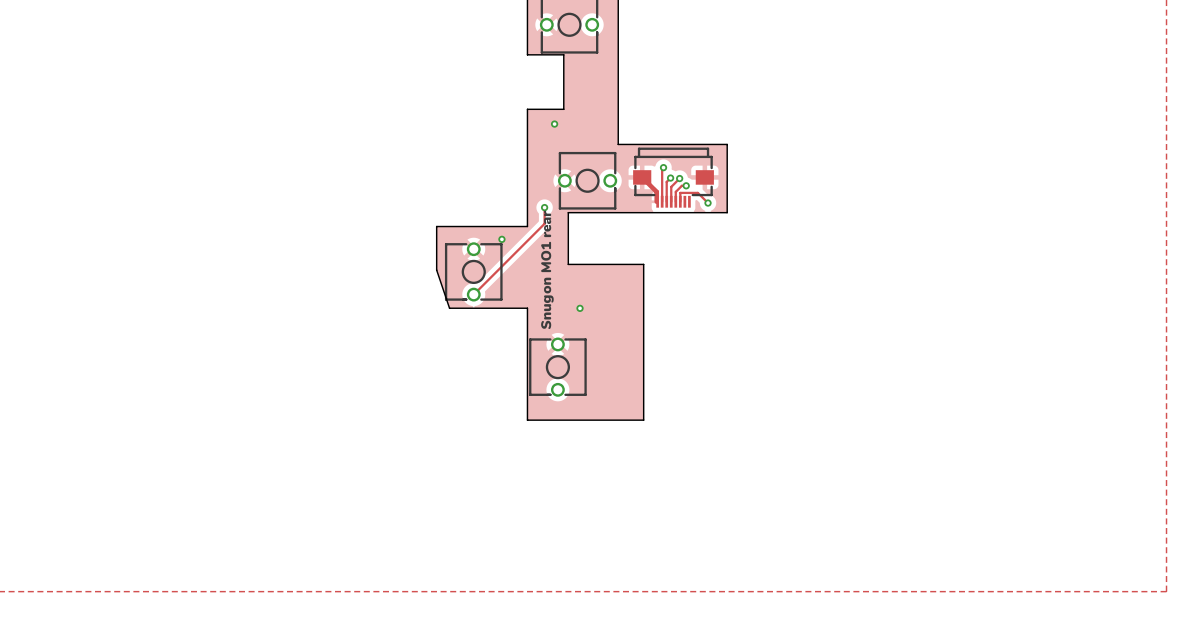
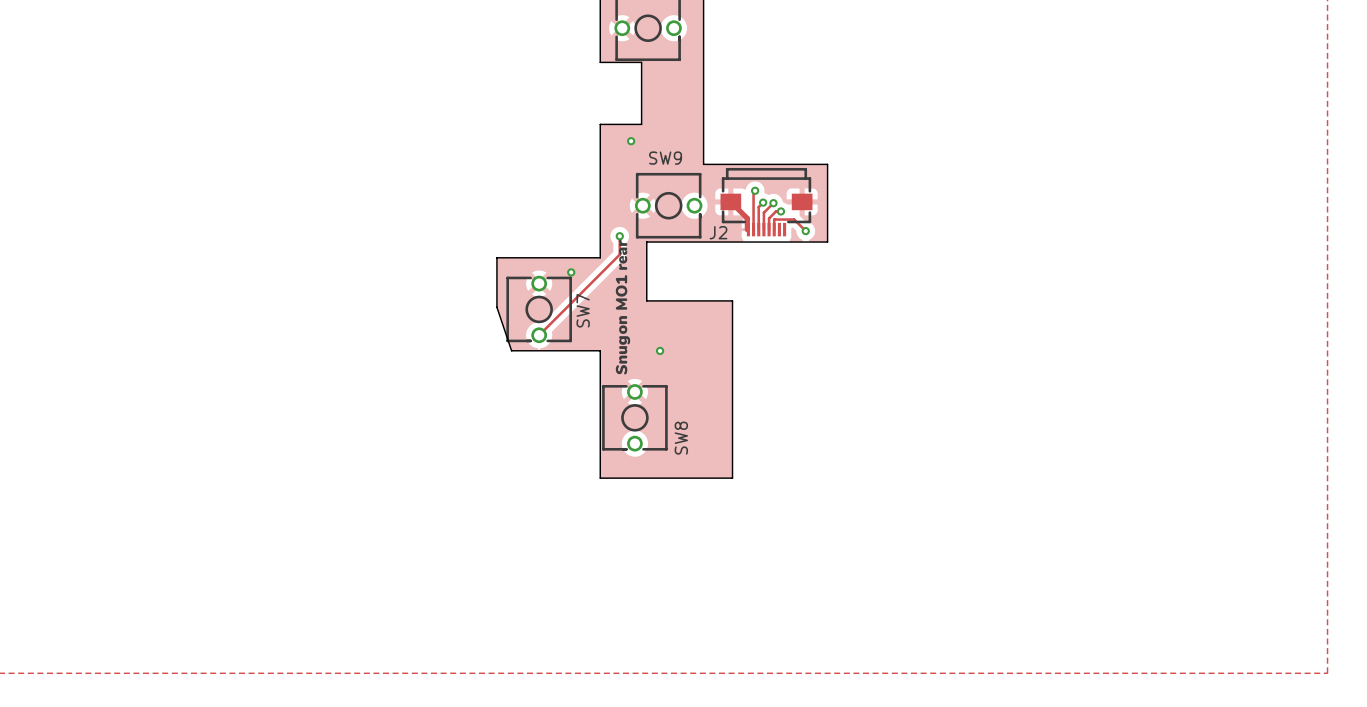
SW9 name: none -> SW9 (665, 158)
J2 name: none -> J2 (718, 232)
SW7 name: none -> SW7 (583, 310)
SW8 name: none -> SW8 (681, 438)

